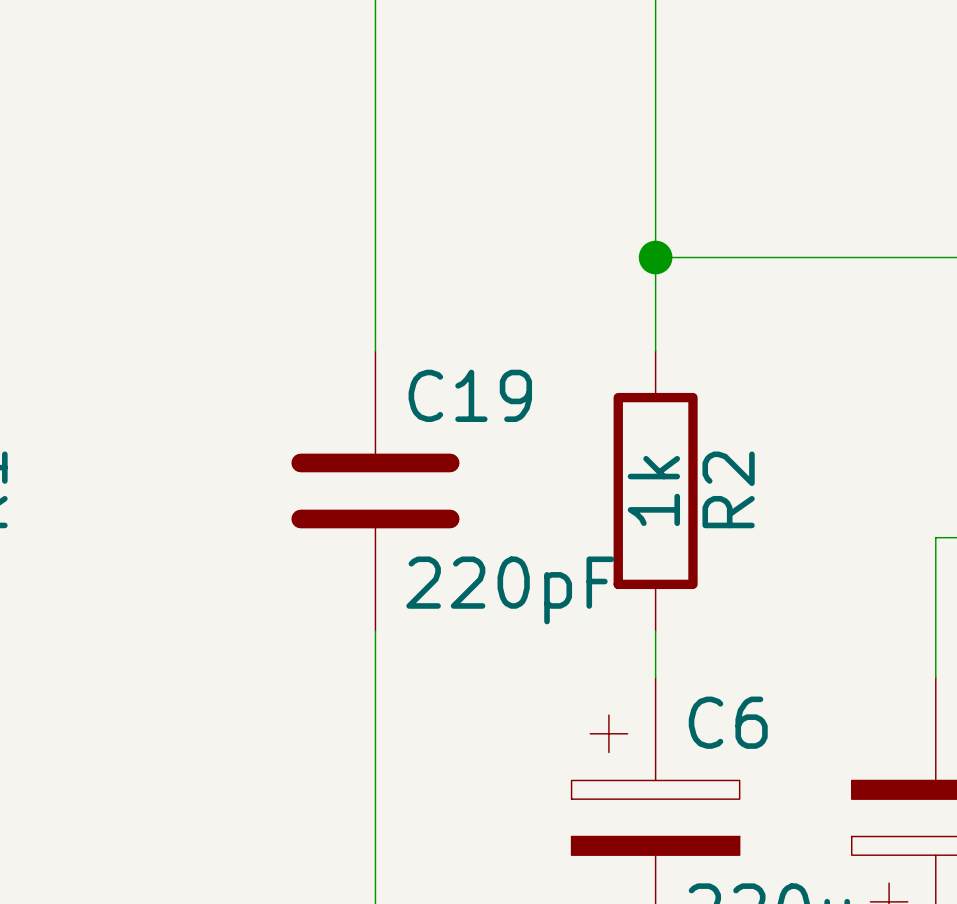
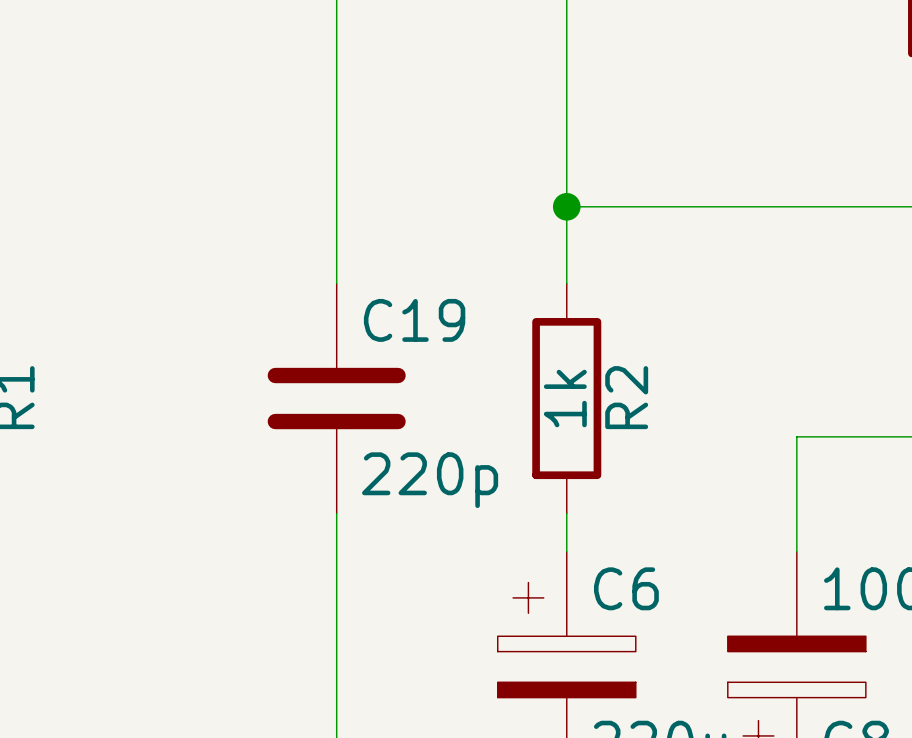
C19 value: 220pF (510, 590) -> 220p (430, 480)

